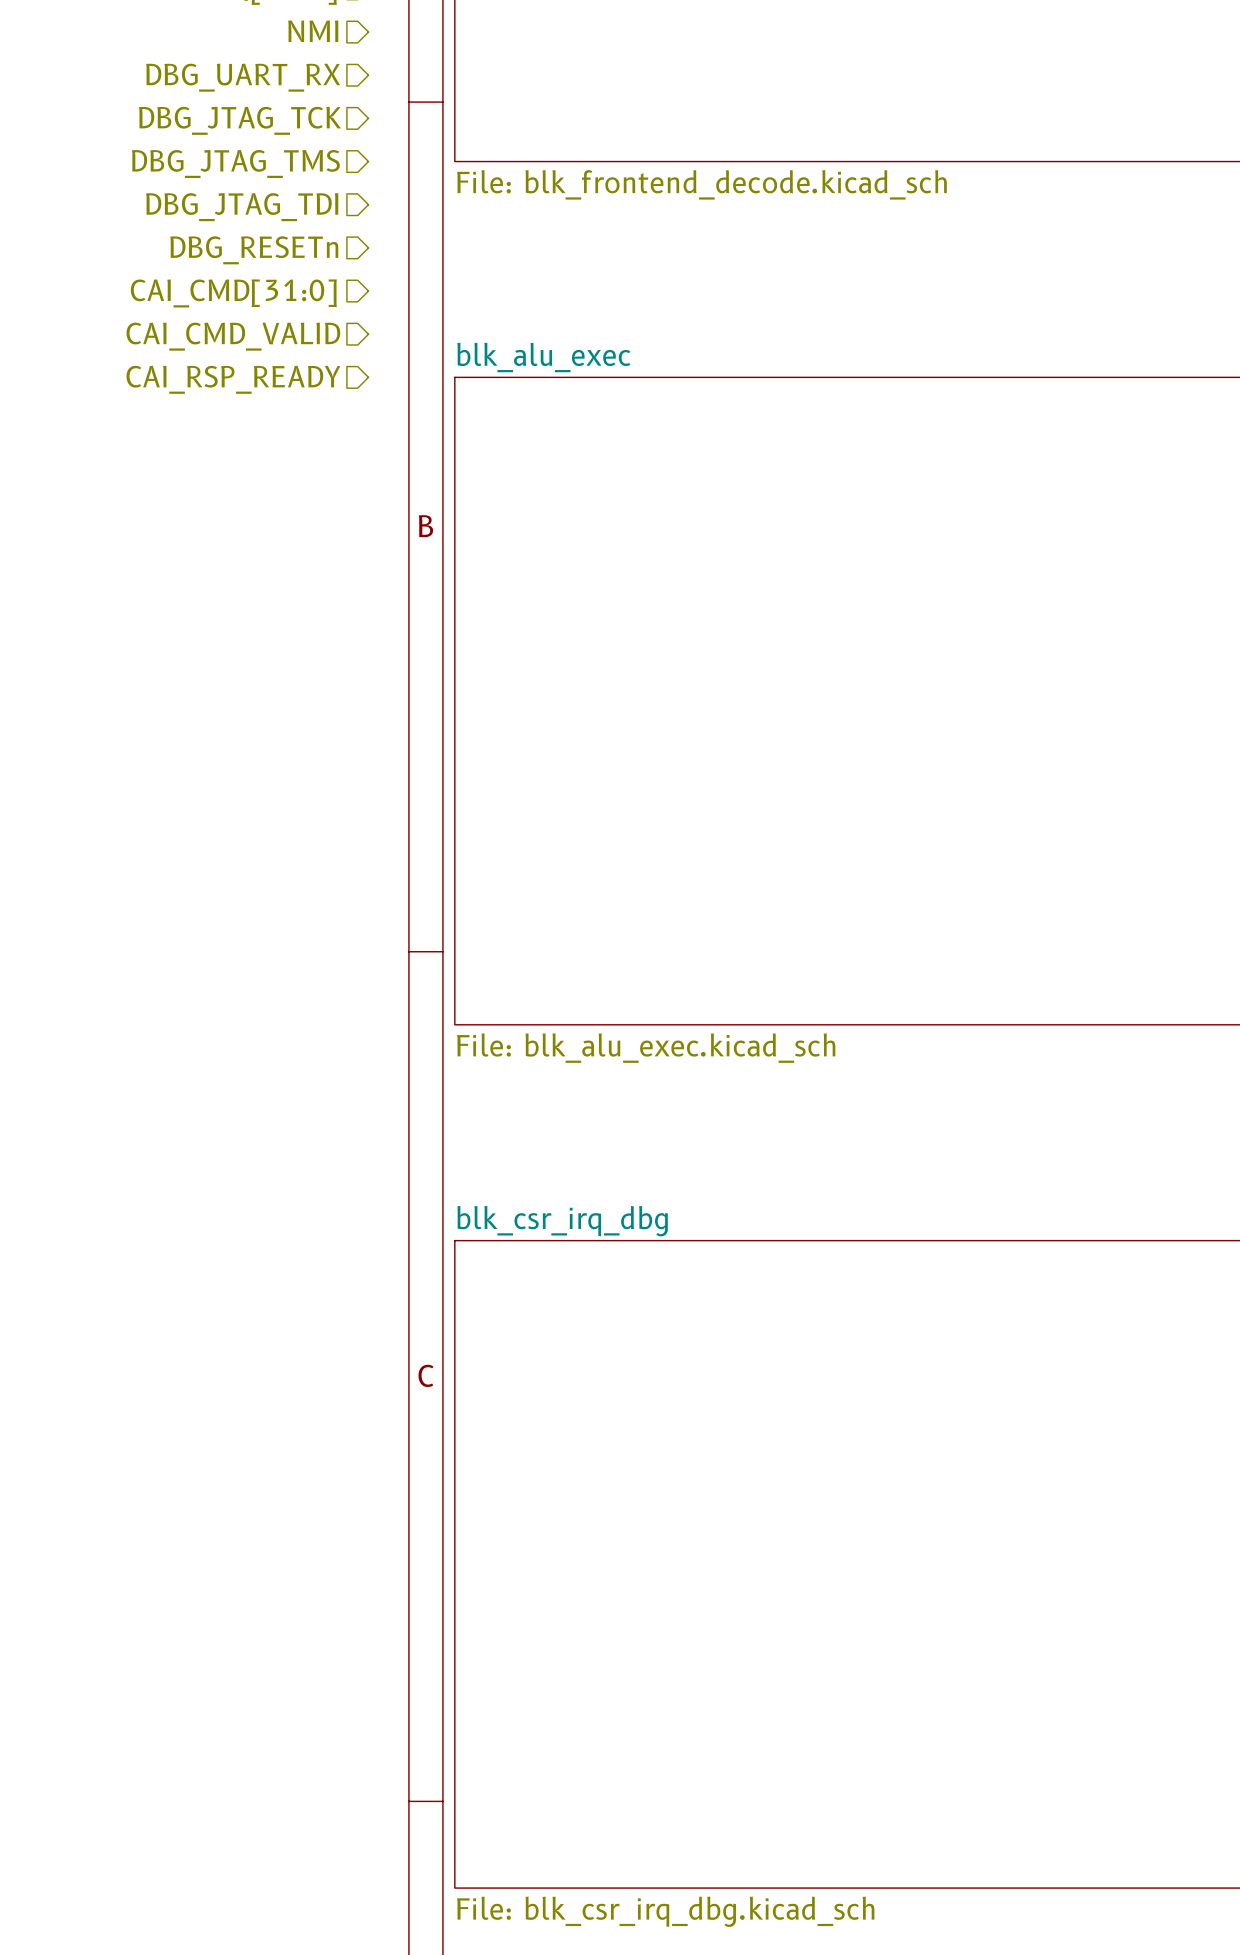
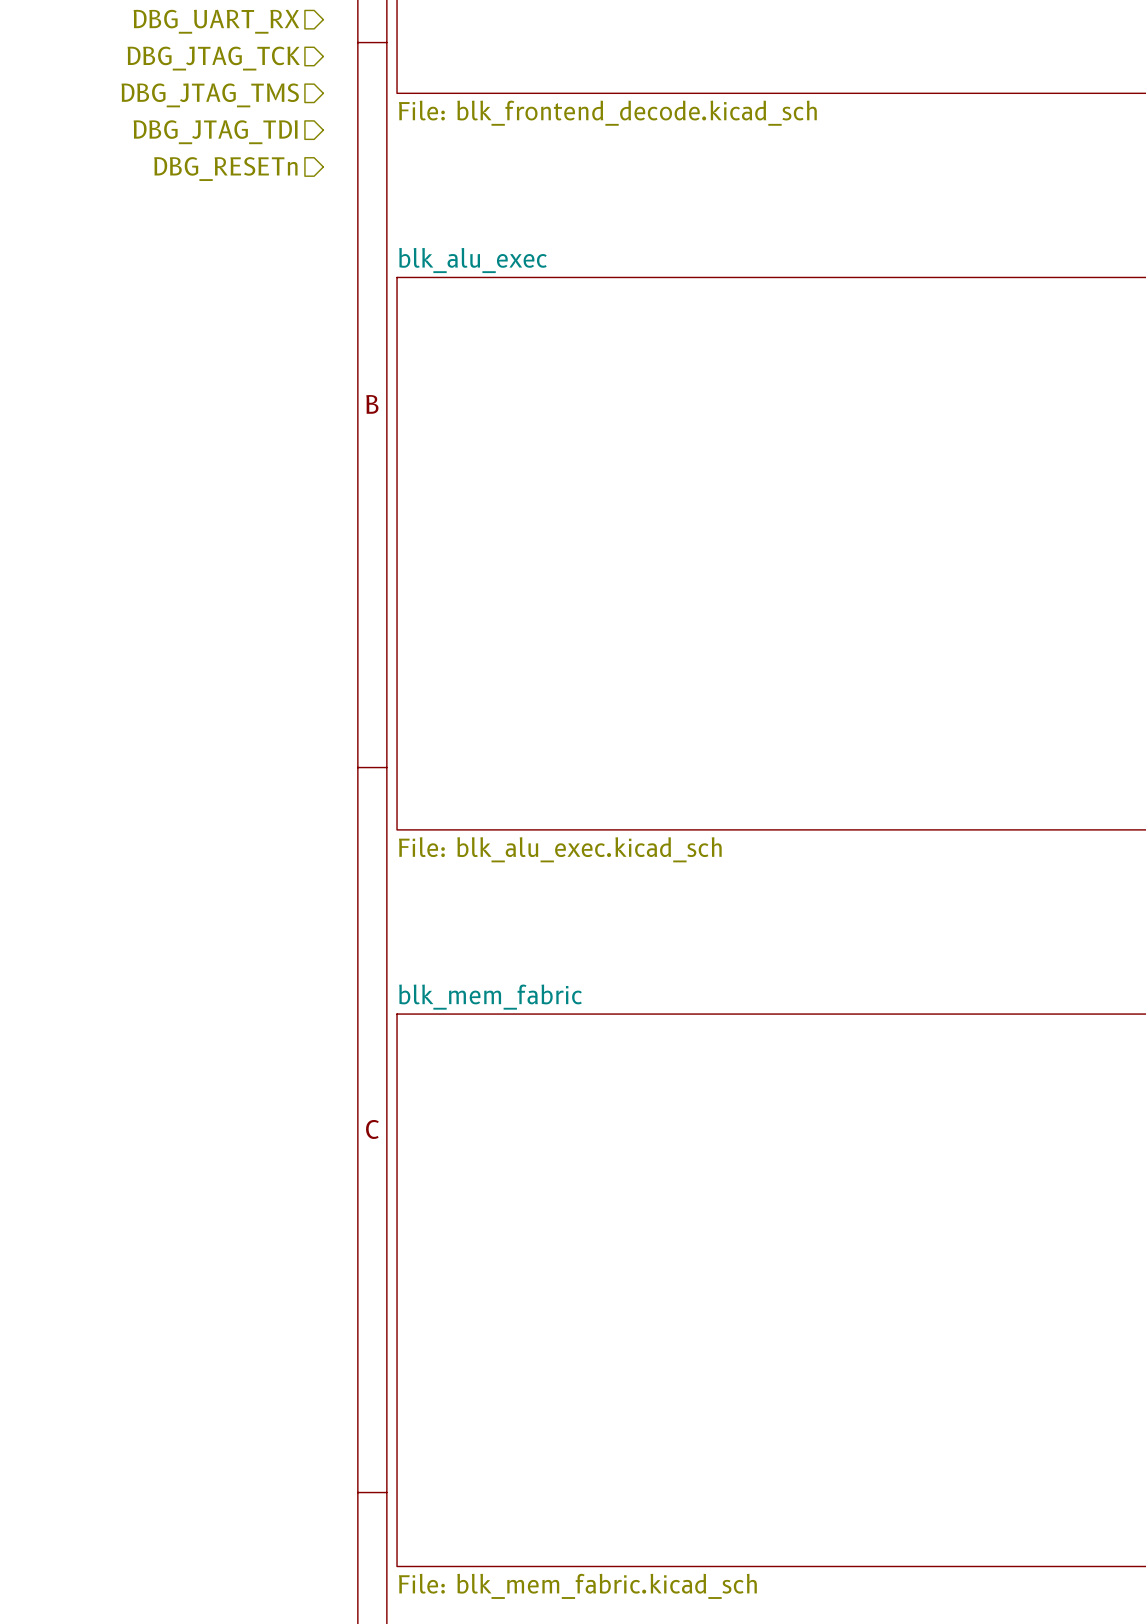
hierarchical label: CAI_CMD[31:0] (233, 293) -> none
hierarchical label: CAI_CMD_VALID (233, 336) -> none
hierarchical label: CAI_RSP_READY (233, 379) -> none
sheet blk_csr_irq_dbg name: blk_csr_irq_dbg (562, 1221) -> blk_mem_fabric (490, 997)
sheet blk_csr_irq_dbg value: File: blk_csr_irq_dbg.kicad_sch (665, 1911) -> File: blk_mem_fabric.kicad_sch (577, 1586)

